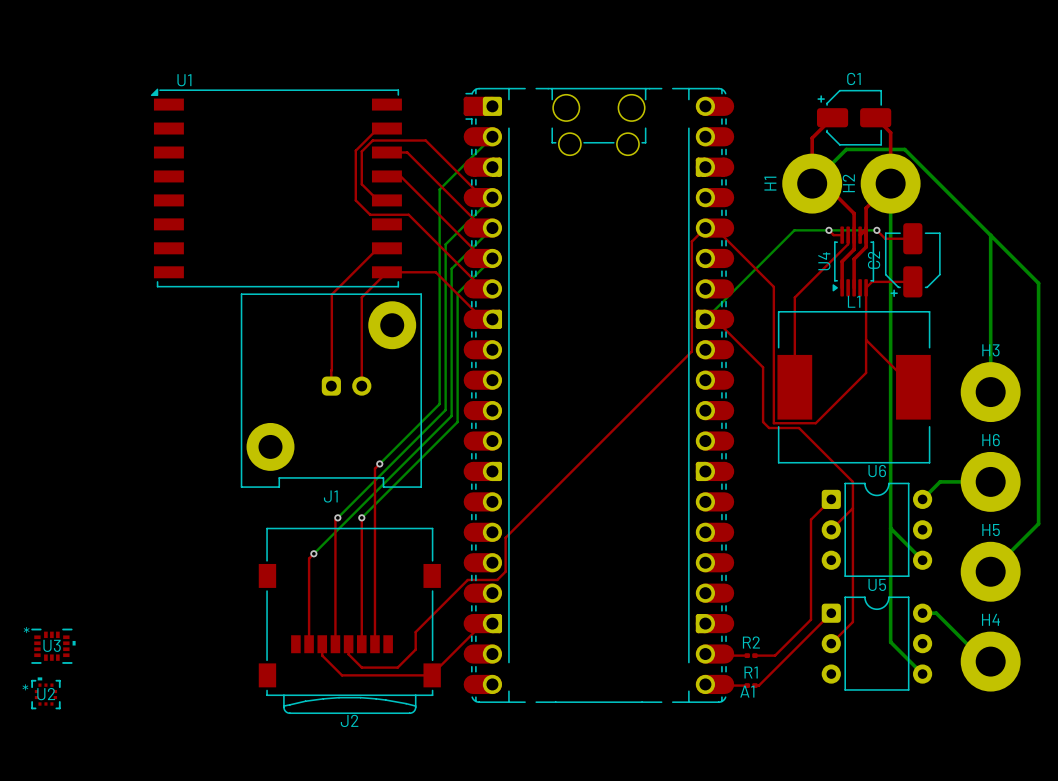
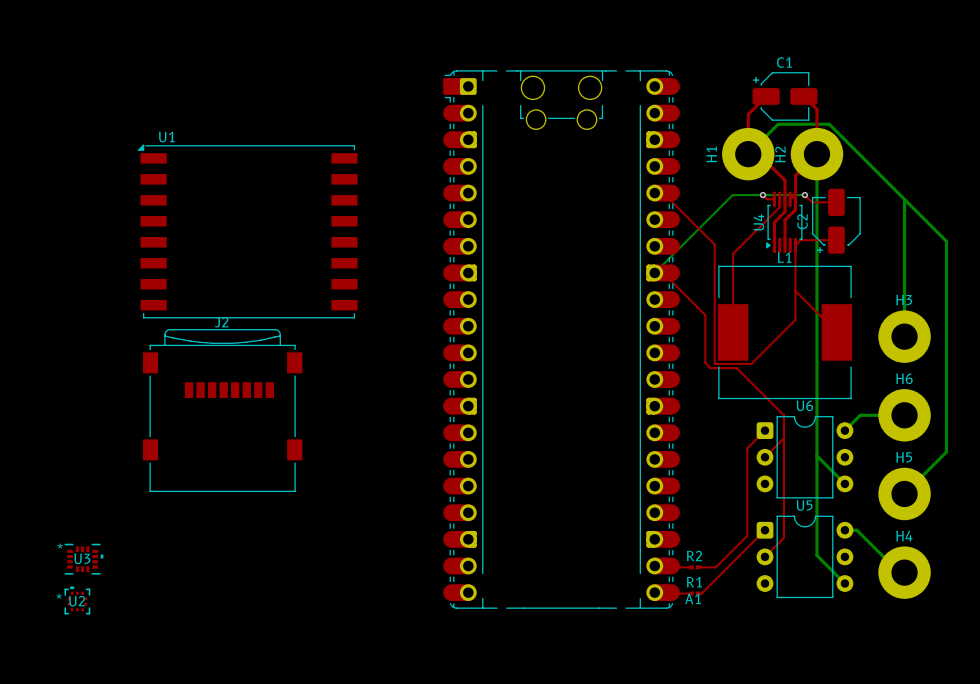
top track: (386, 128) (377, 128) (355, 150) (355, 200) (370, 214) (408, 214) (482, 288) -> none
bottom track: (492, 136) (439, 189) (439, 404) (379, 463) -> none
top track: (386, 152) (407, 152) (482, 228) -> none
top track: (386, 176) (400, 176) (482, 258) -> none
U1 position: (276, 187) -> (247, 231)
top track: (482, 197) (425, 140) (372, 140) (361, 151) (361, 184) (377, 200) (386, 200) -> none
bottom track: (492, 197) (445, 244) (445, 410) (337, 517) -> none
bottom track: (492, 228) (451, 268) (451, 416) (313, 553) -> none
top track: (705, 228) (691, 241) (691, 351) (505, 537) (505, 571) (497, 579) (467, 579) (415, 632) (415, 649) (397, 667) (361, 667) (348, 654) (348, 644) -> none
top track: (386, 248) (377, 248) (331, 294) (331, 386) -> none
bottom track: (492, 258) (457, 293) (457, 422) (361, 517) -> none
top track: (482, 319) (435, 272) (386, 272) (361, 297) (361, 386) -> none
J1: (331, 390) -> none
top track: (379, 463) (374, 468) (374, 644) -> none
via: (379, 463) -> none
top track: (337, 517) (335, 520) (335, 644) -> none
via: (337, 517) -> none
top track: (361, 517) (361, 644) -> none
via: (361, 517) -> none
top track: (313, 553) (309, 558) (309, 644) -> none
via: (313, 553) -> none
J2 rotation: 0° (349, 620) -> 180° (222, 410)
J2 position: (349, 620) -> (222, 410)
top track: (482, 623) (432, 675) (342, 675) (322, 655) (322, 644) -> none

